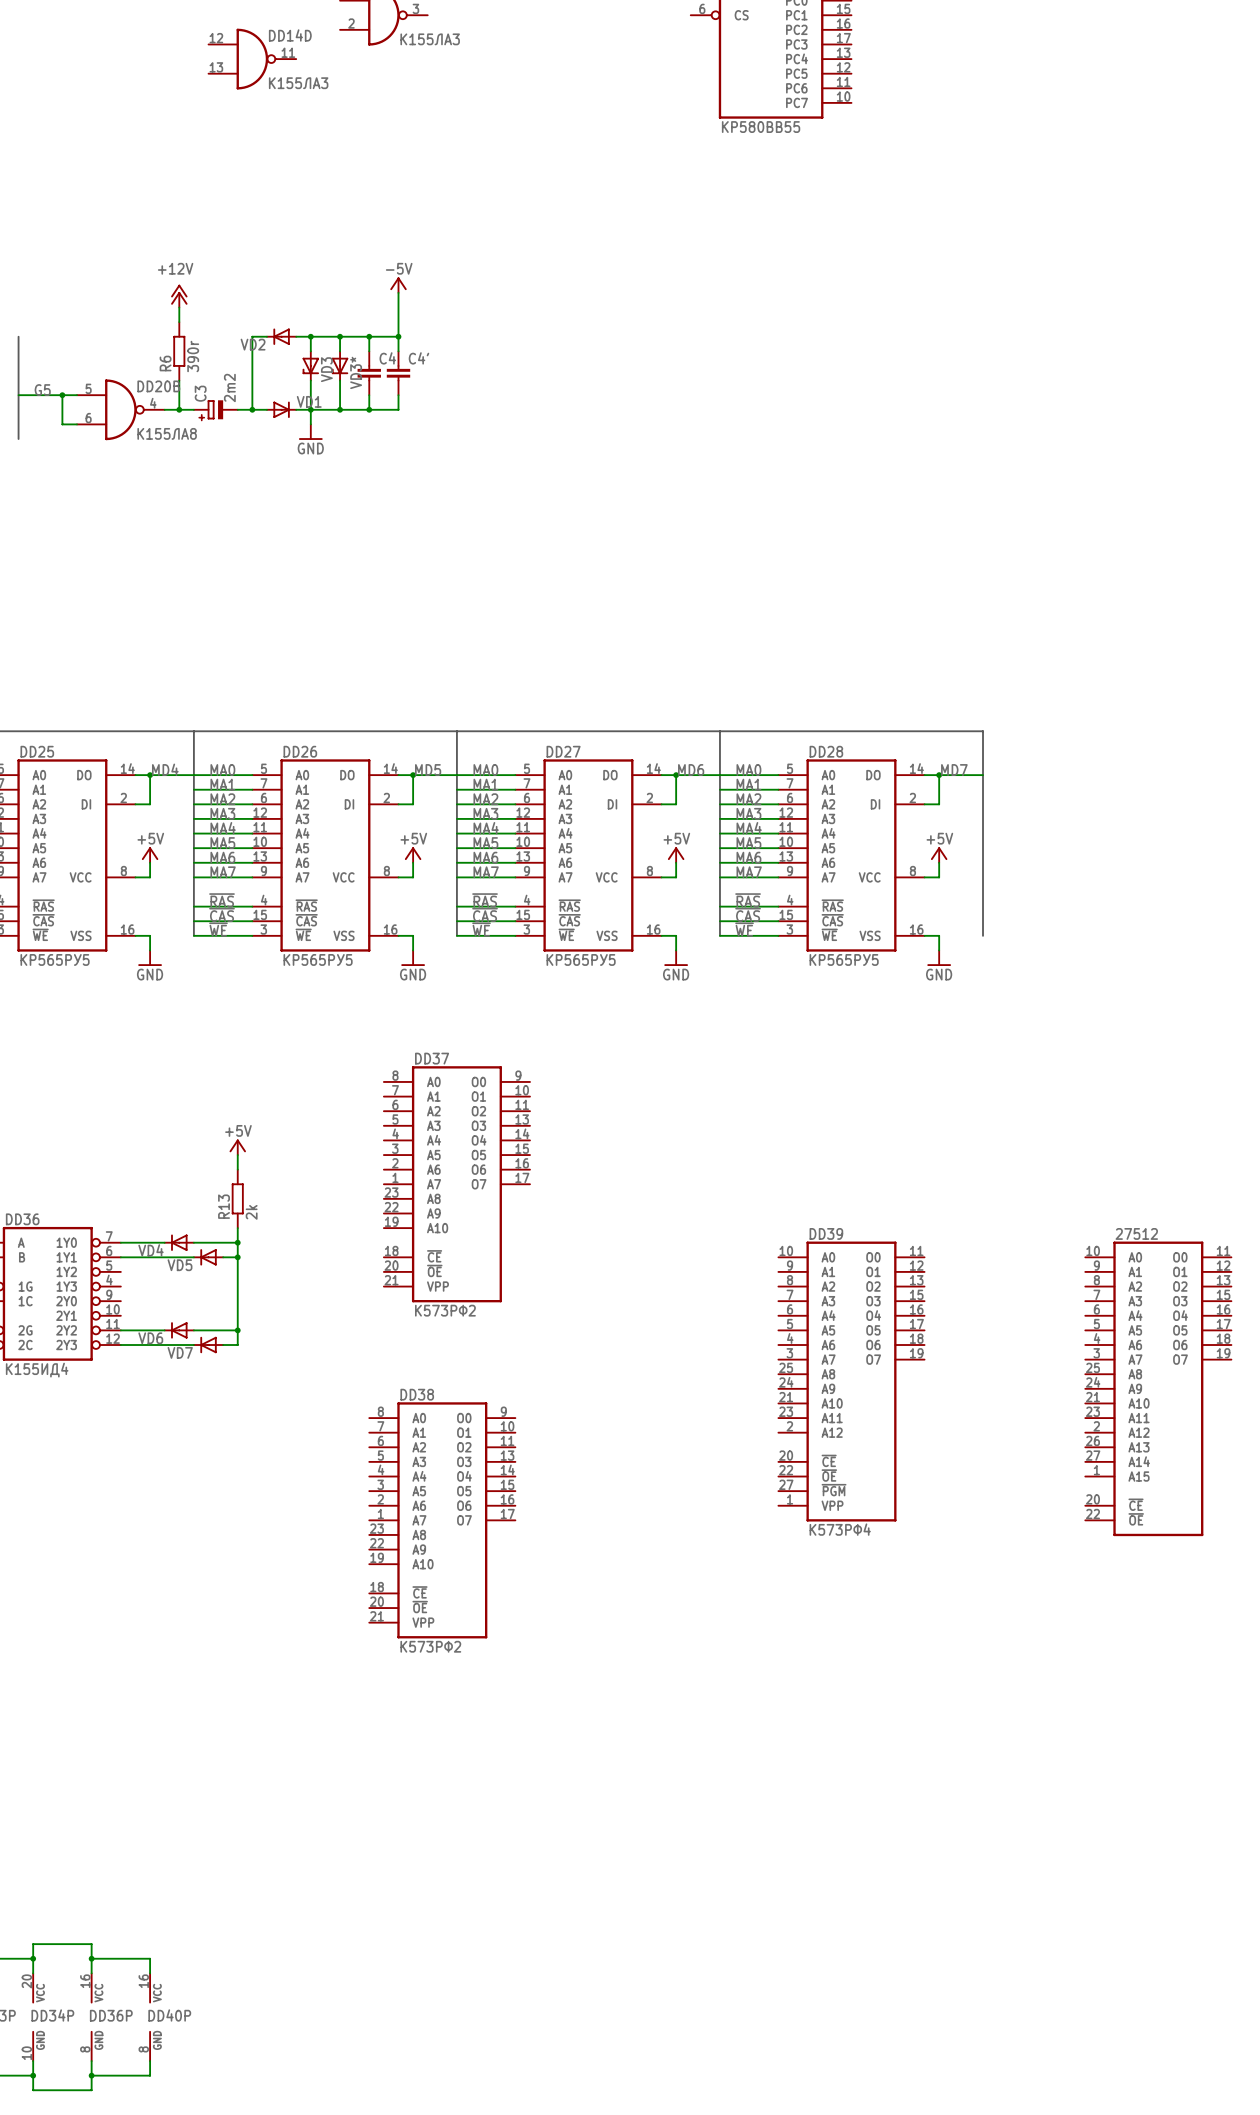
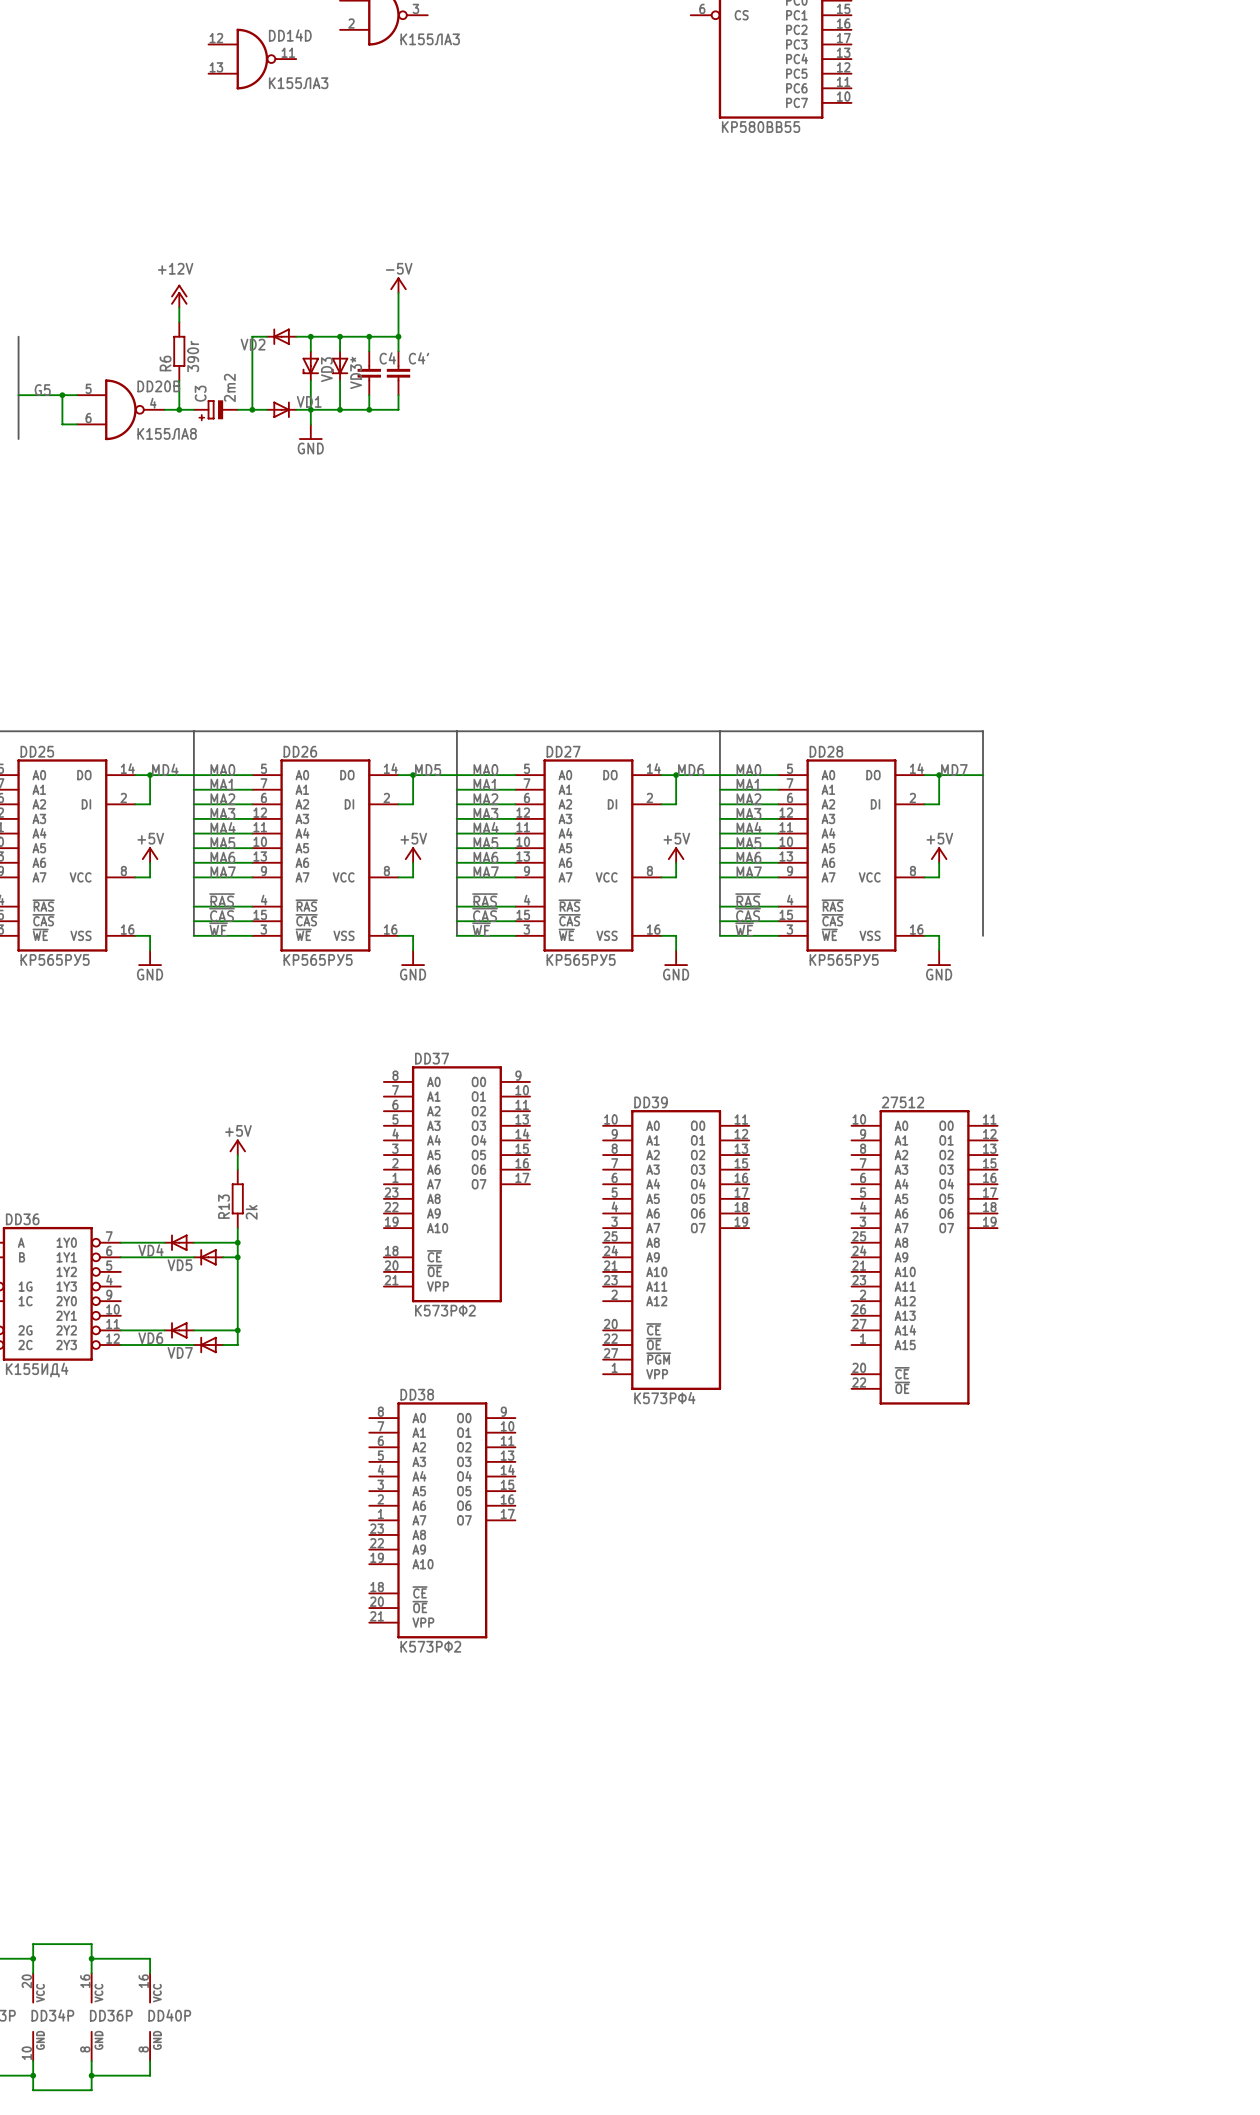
DD39 position: (851, 1381) -> (676, 1250)
27512 position: (1158, 1388) -> (924, 1257)

